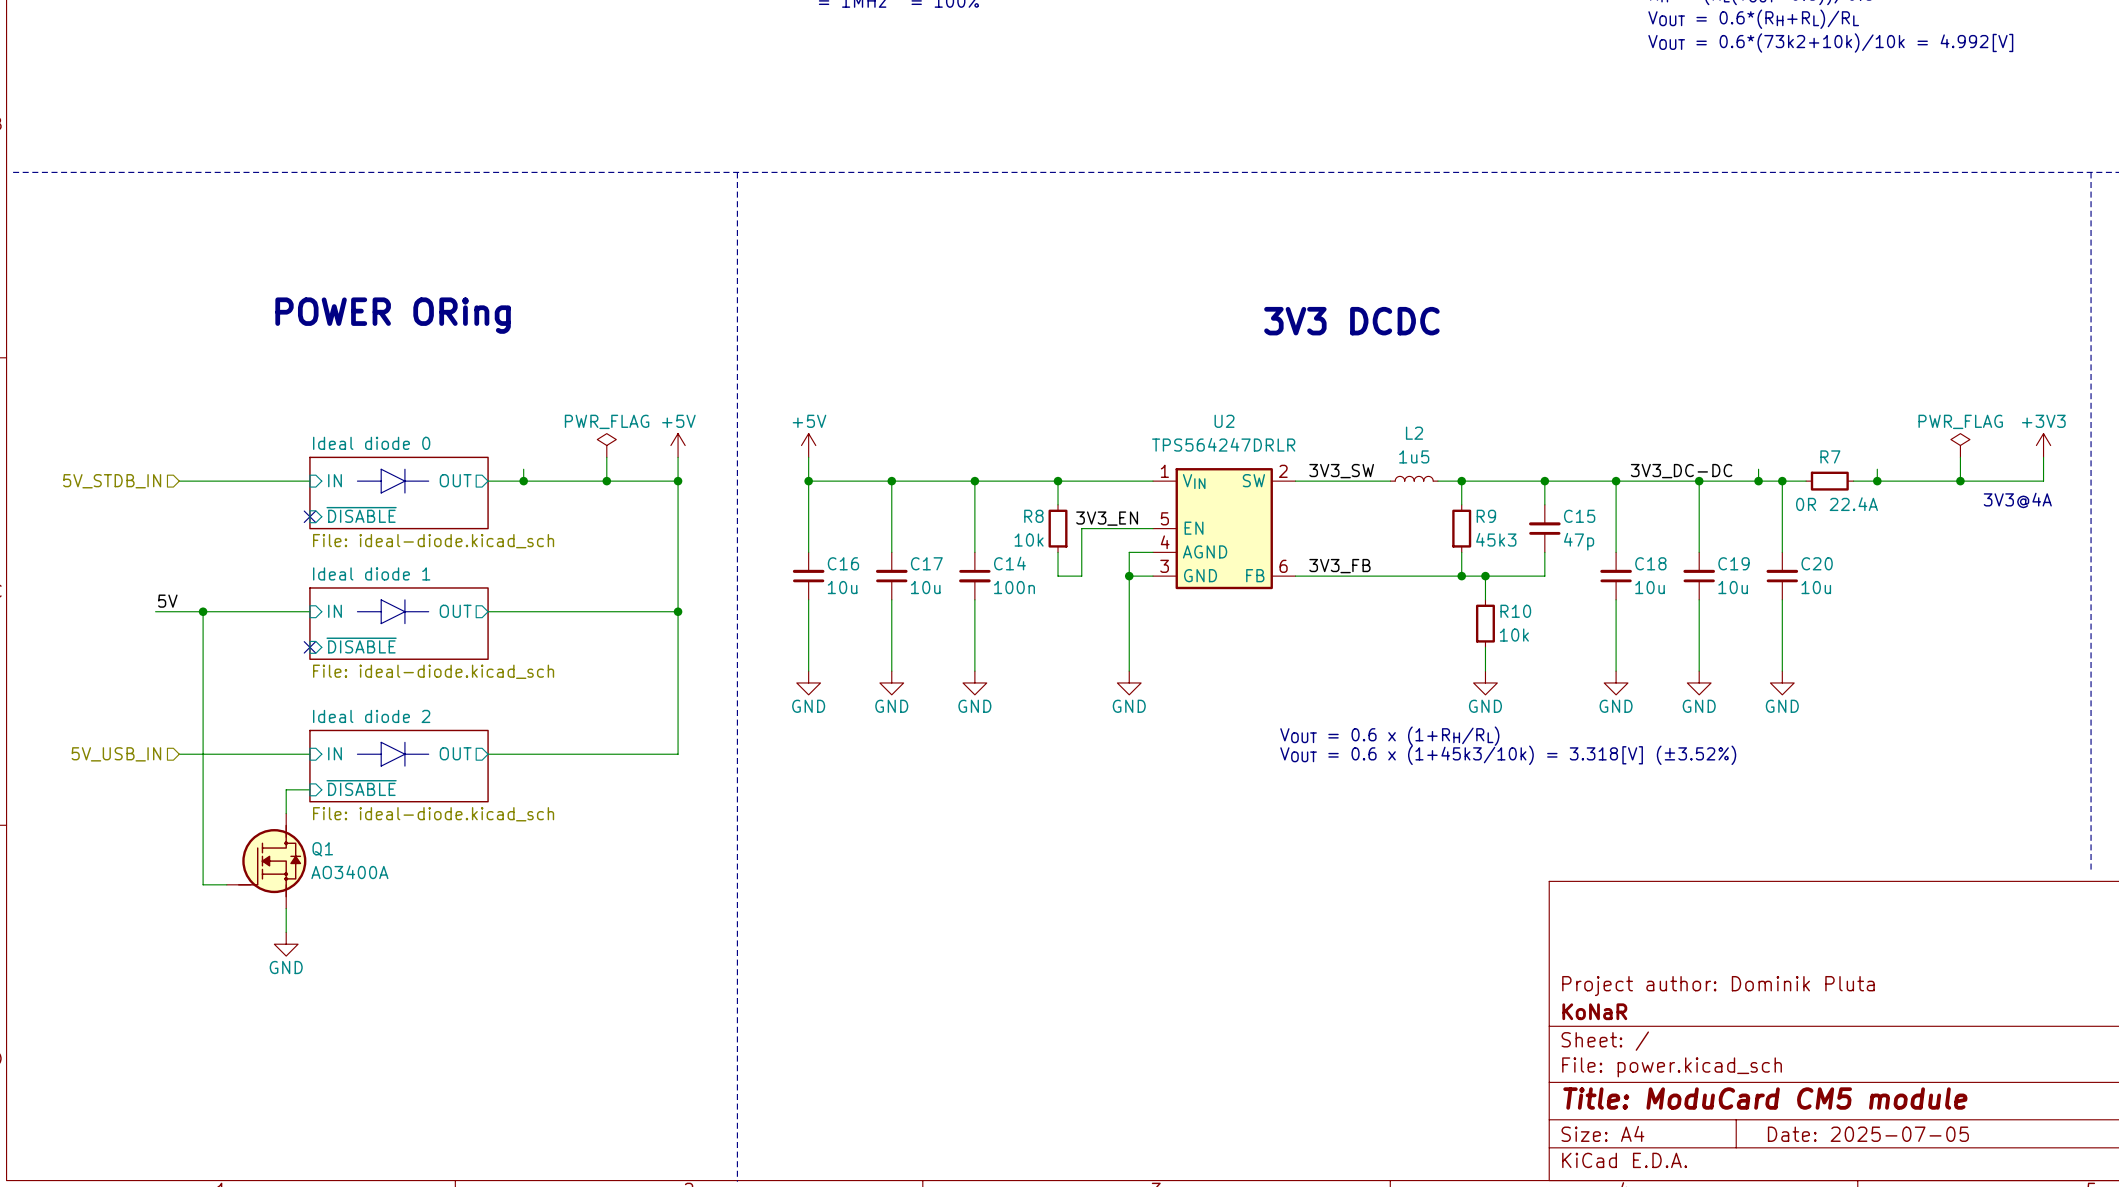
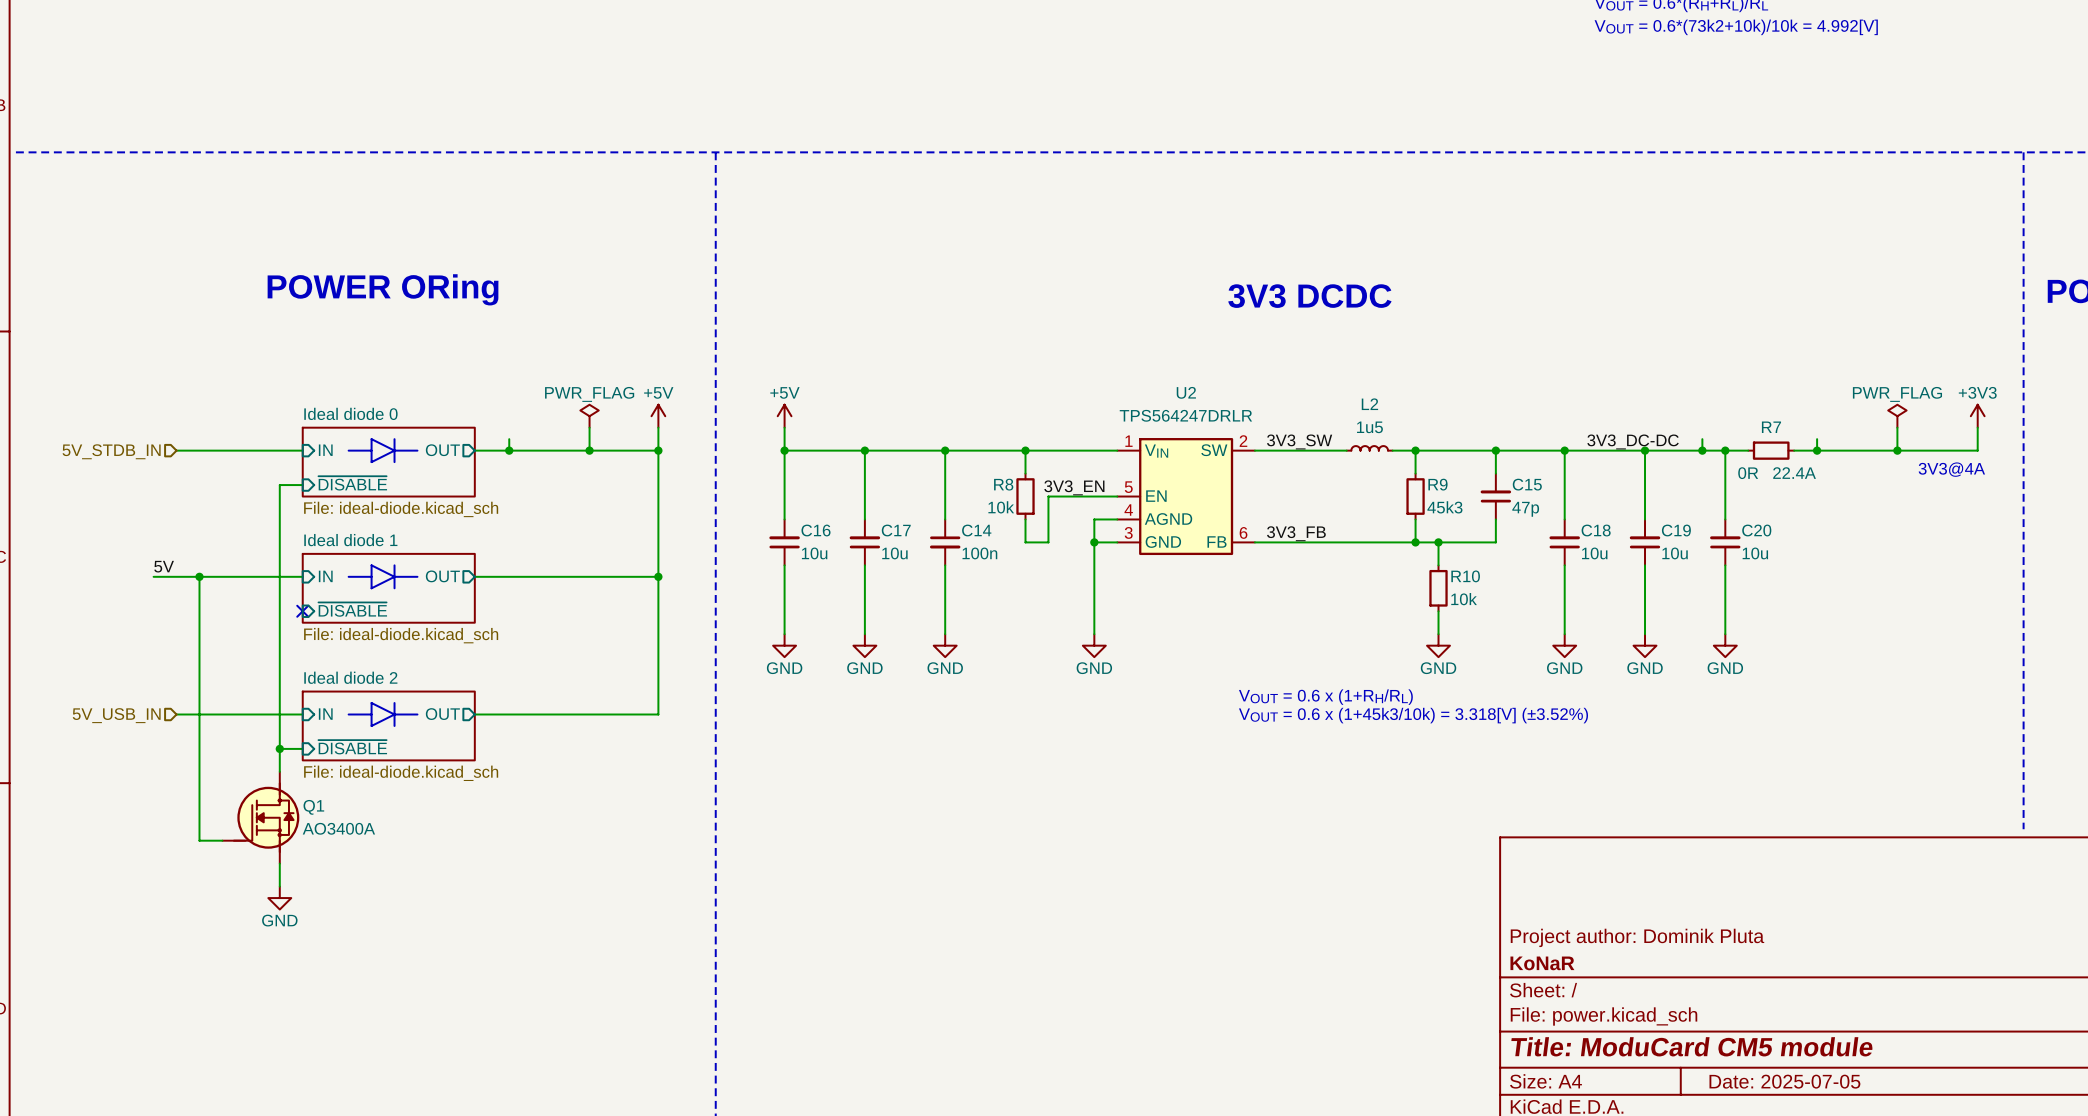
wire: none -> (302, 485) (279, 485) (279, 748)
no-connect mark: (309, 516) -> none
junction: none -> (279, 748)

